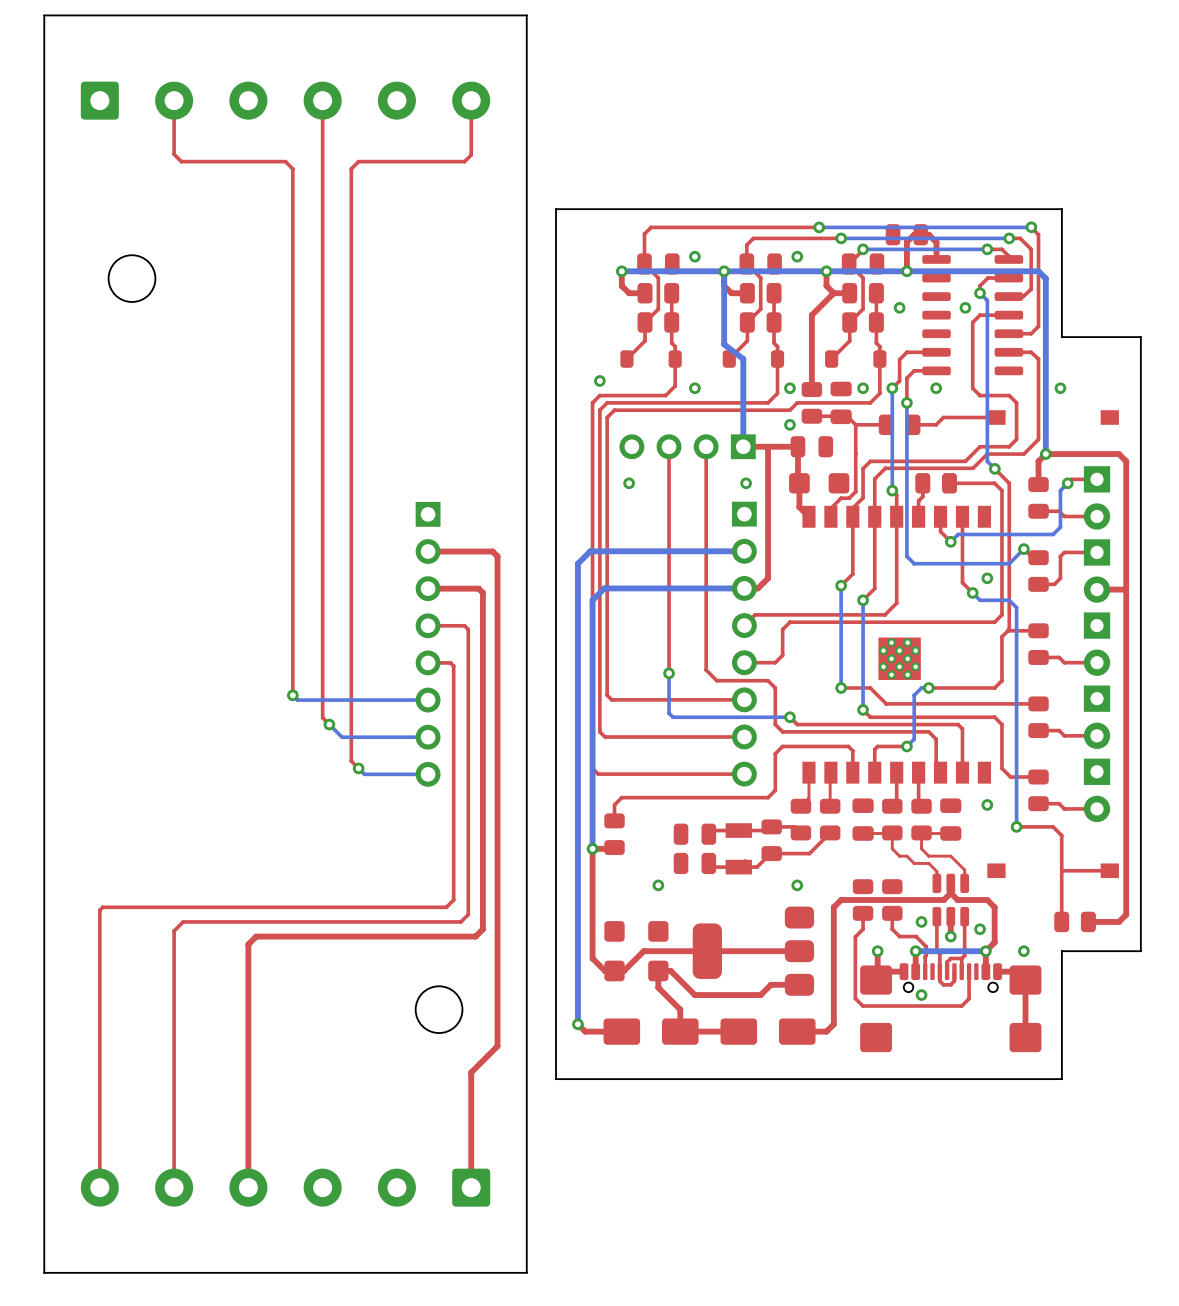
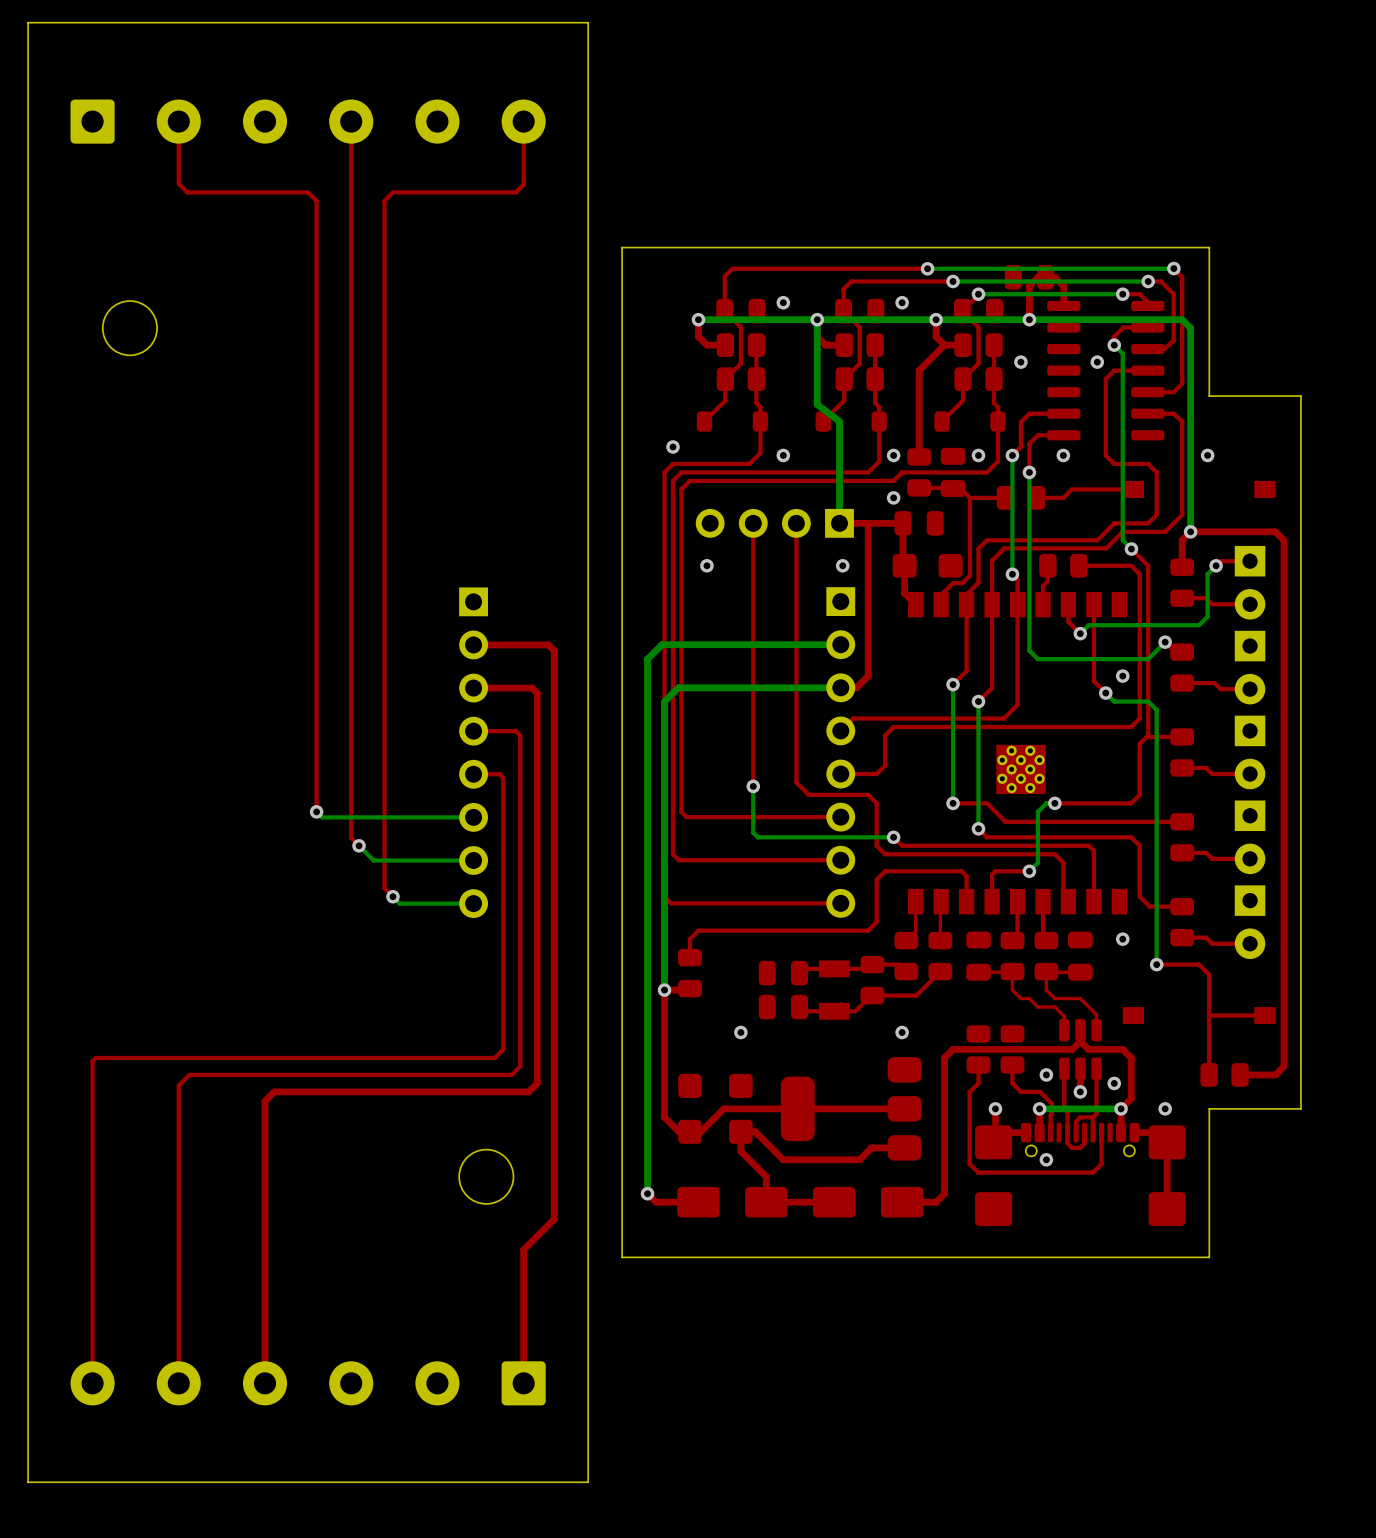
top track: (1097, 552) (1064, 552) (1060, 556) (1060, 578) (1054, 584) -> (1250, 689) (1220, 689) (1214, 683) (1200, 683)
top track: (1126, 589) (1097, 589) -> none

